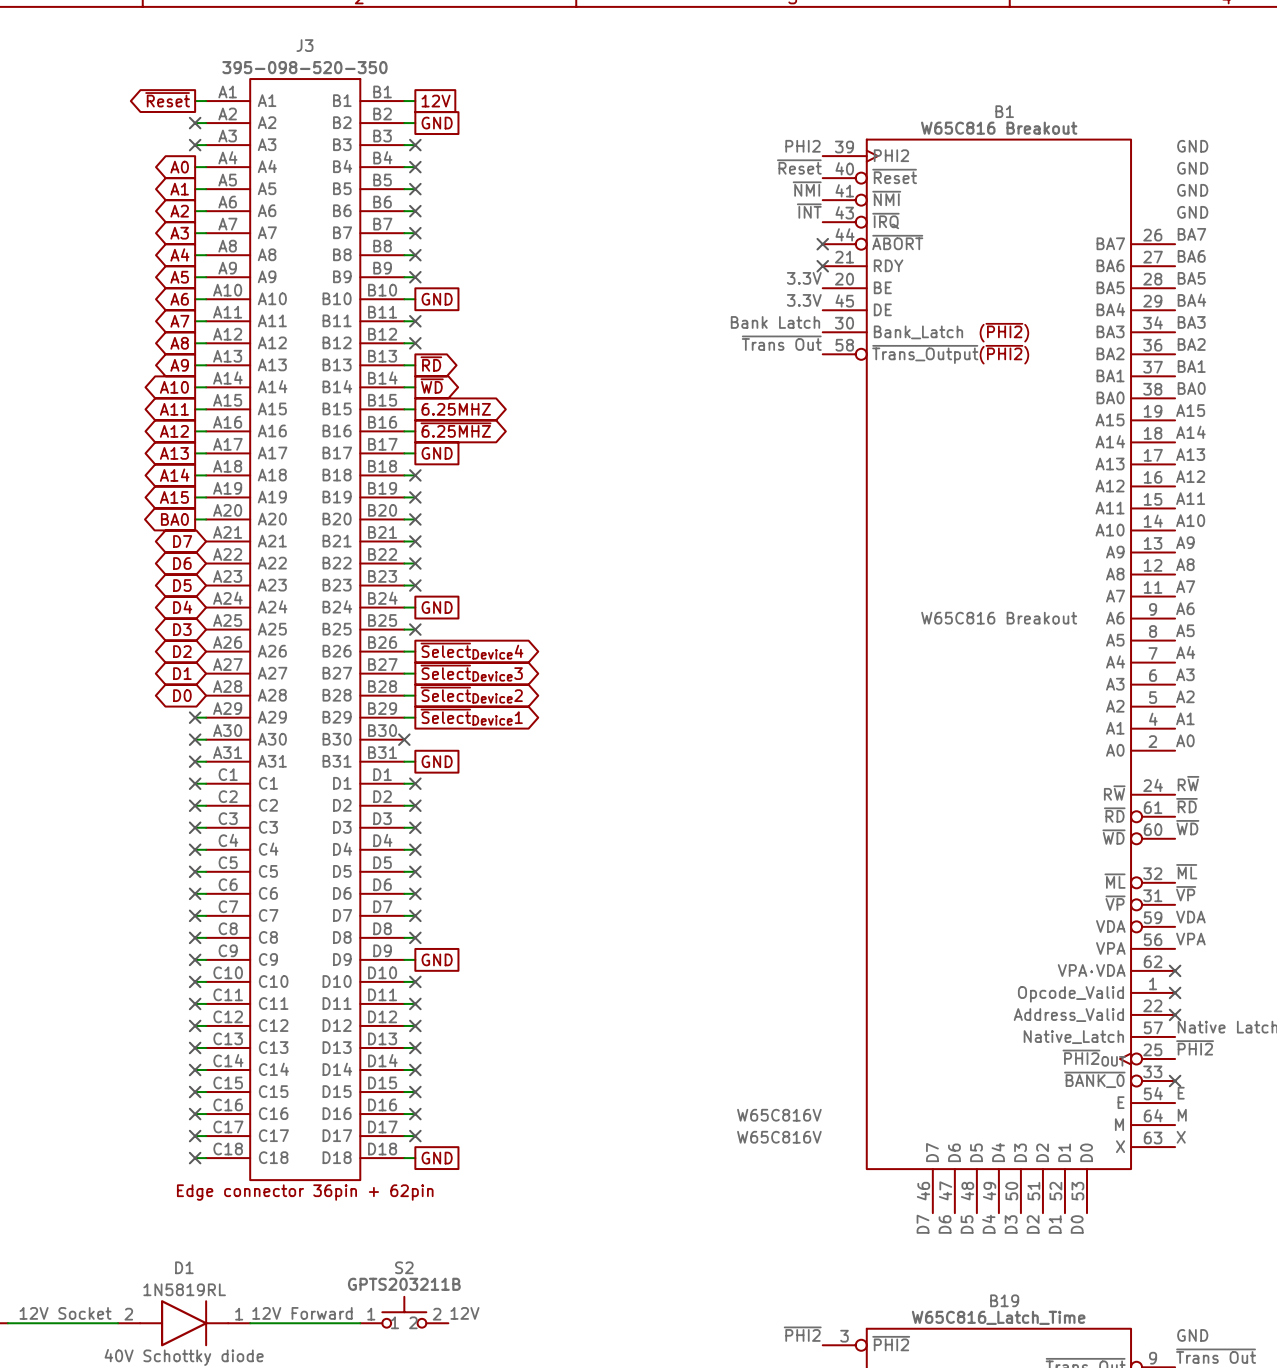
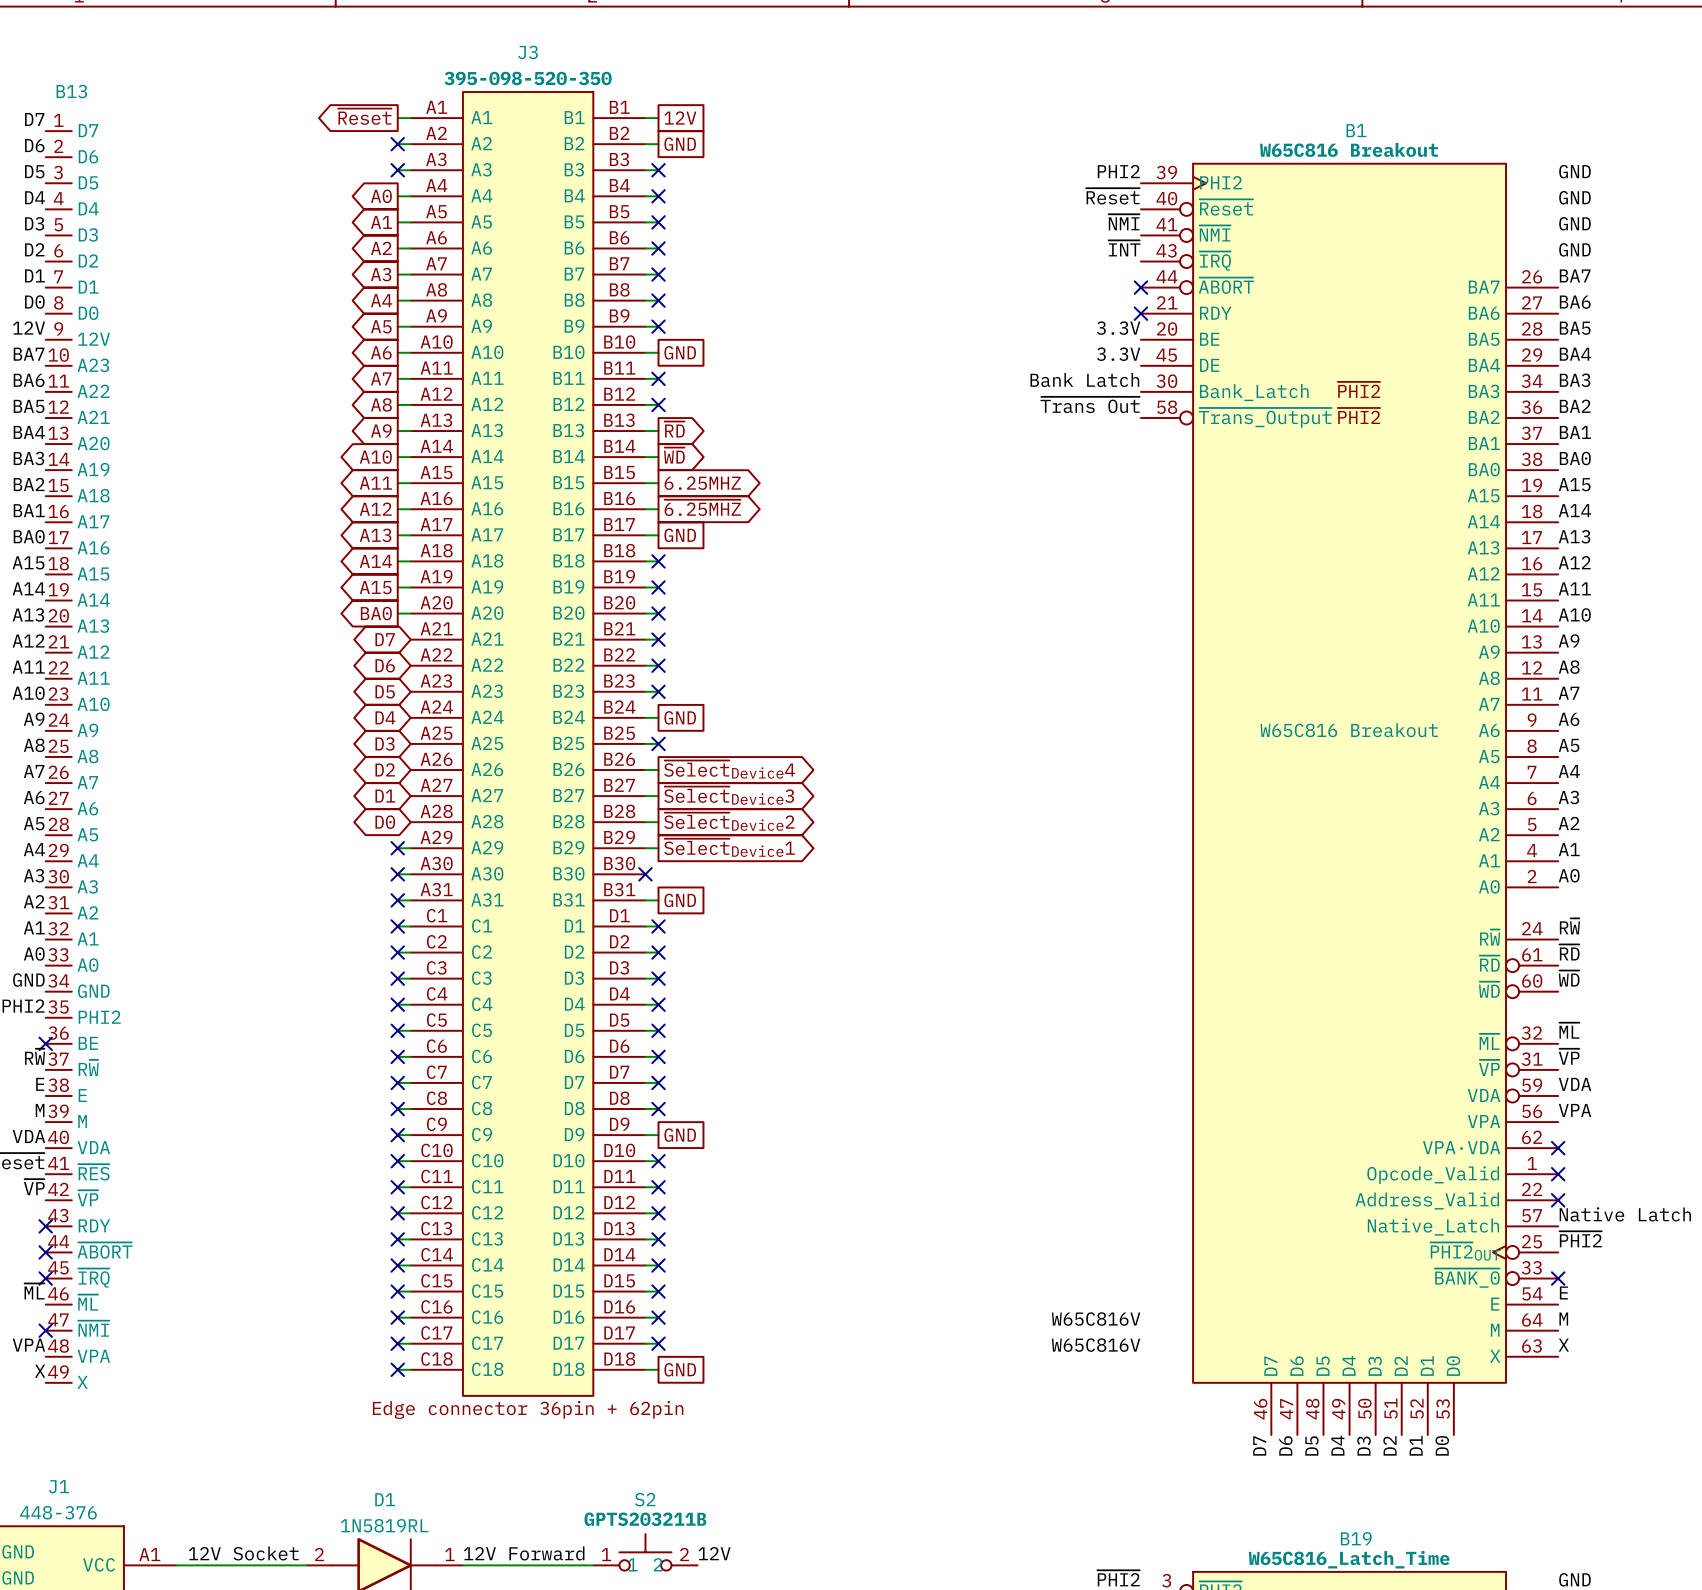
B1 text: none -> ~{PHI2} (1359, 389)
B1 text: (~{PHI2}) (1004, 332) -> none
B1 text: none -> ~{PHI2} (1359, 415)
B1 text: (~{PHI2}) (1004, 354) -> none

